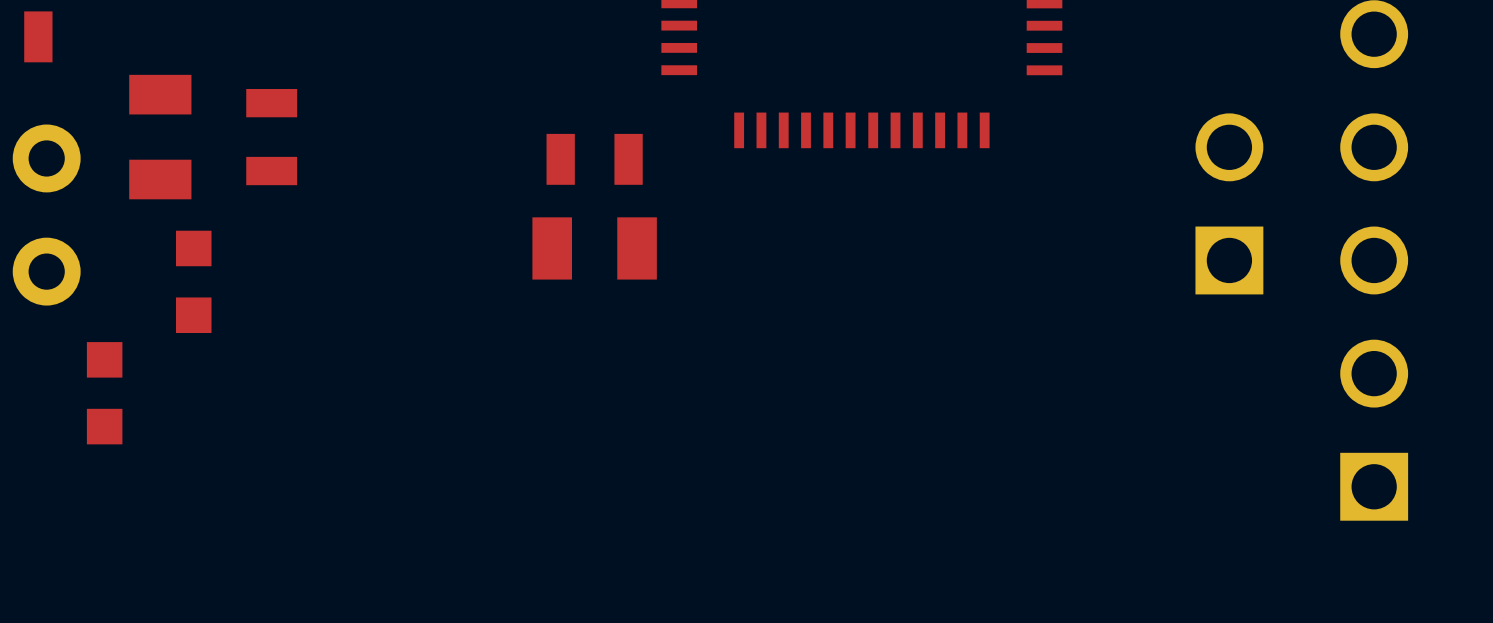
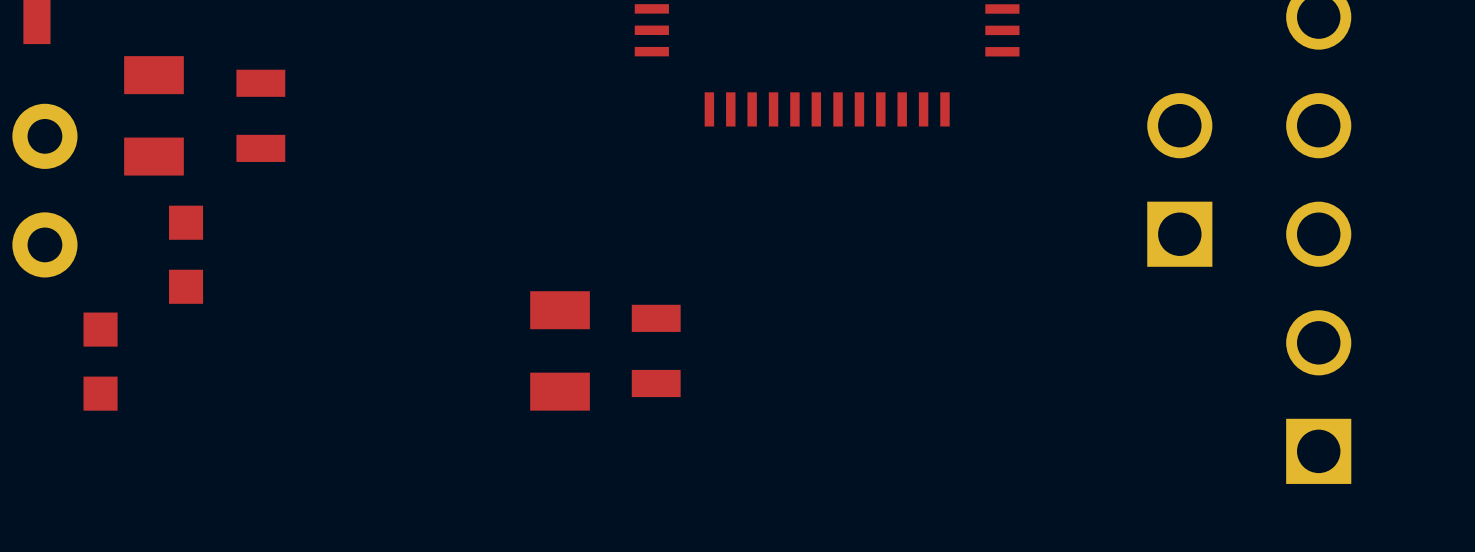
part rotation: 0° (594, 159) -> 90° clockwise (656, 350)
part position: (594, 159) -> (656, 350)
part rotation: 0° (594, 248) -> 90° clockwise (560, 350)
part position: (594, 248) -> (560, 350)

